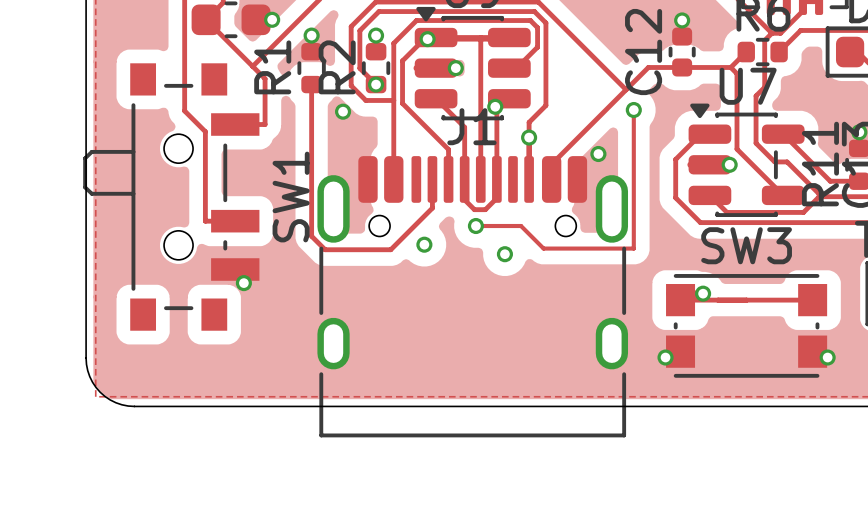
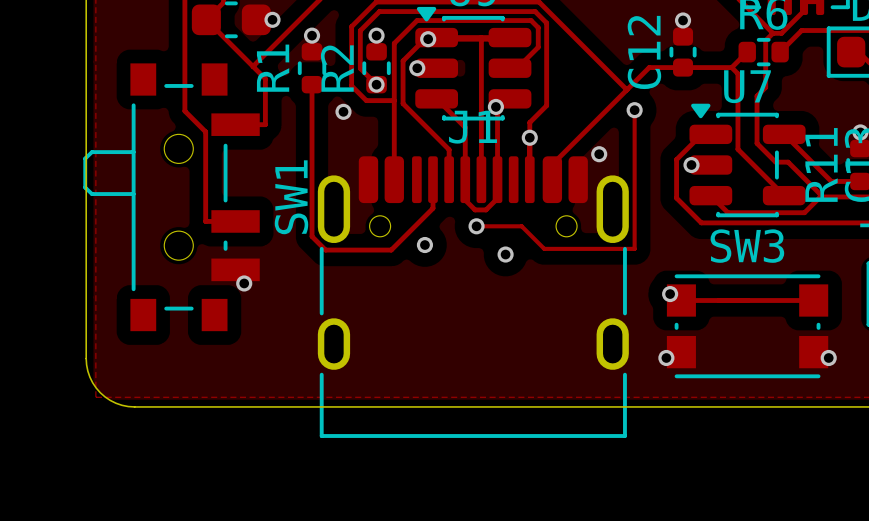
via position: (455, 68) -> (417, 68)
via position: (729, 164) -> (691, 165)
via position: (703, 293) -> (670, 294)

